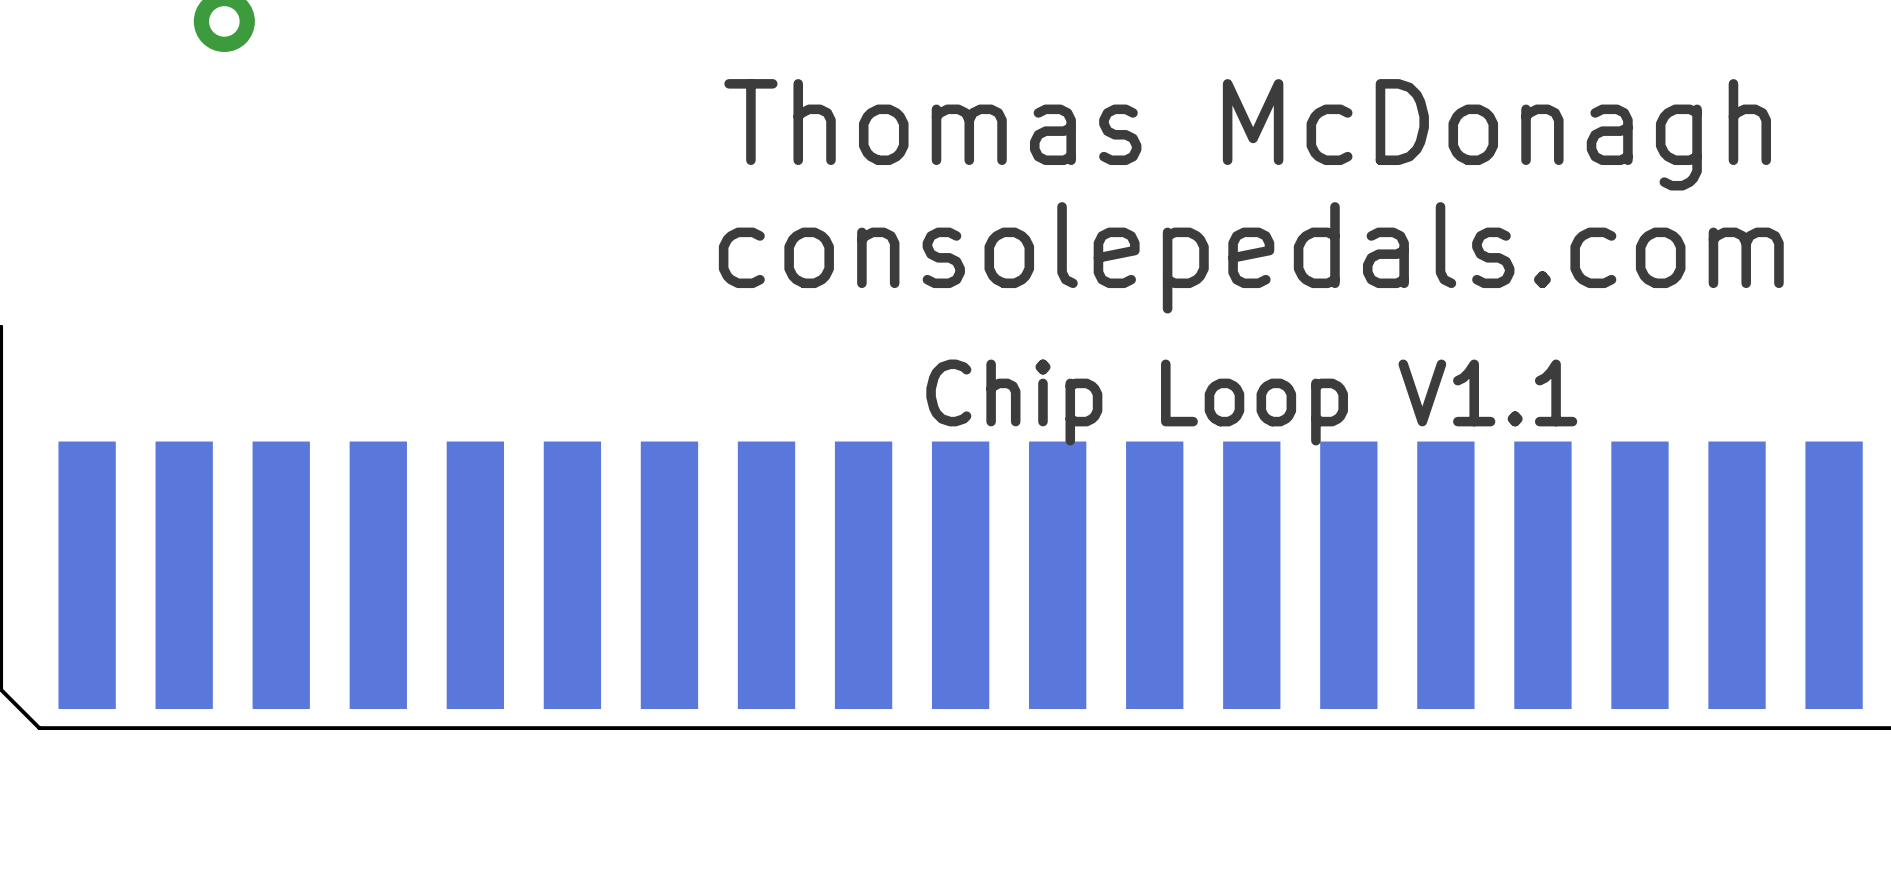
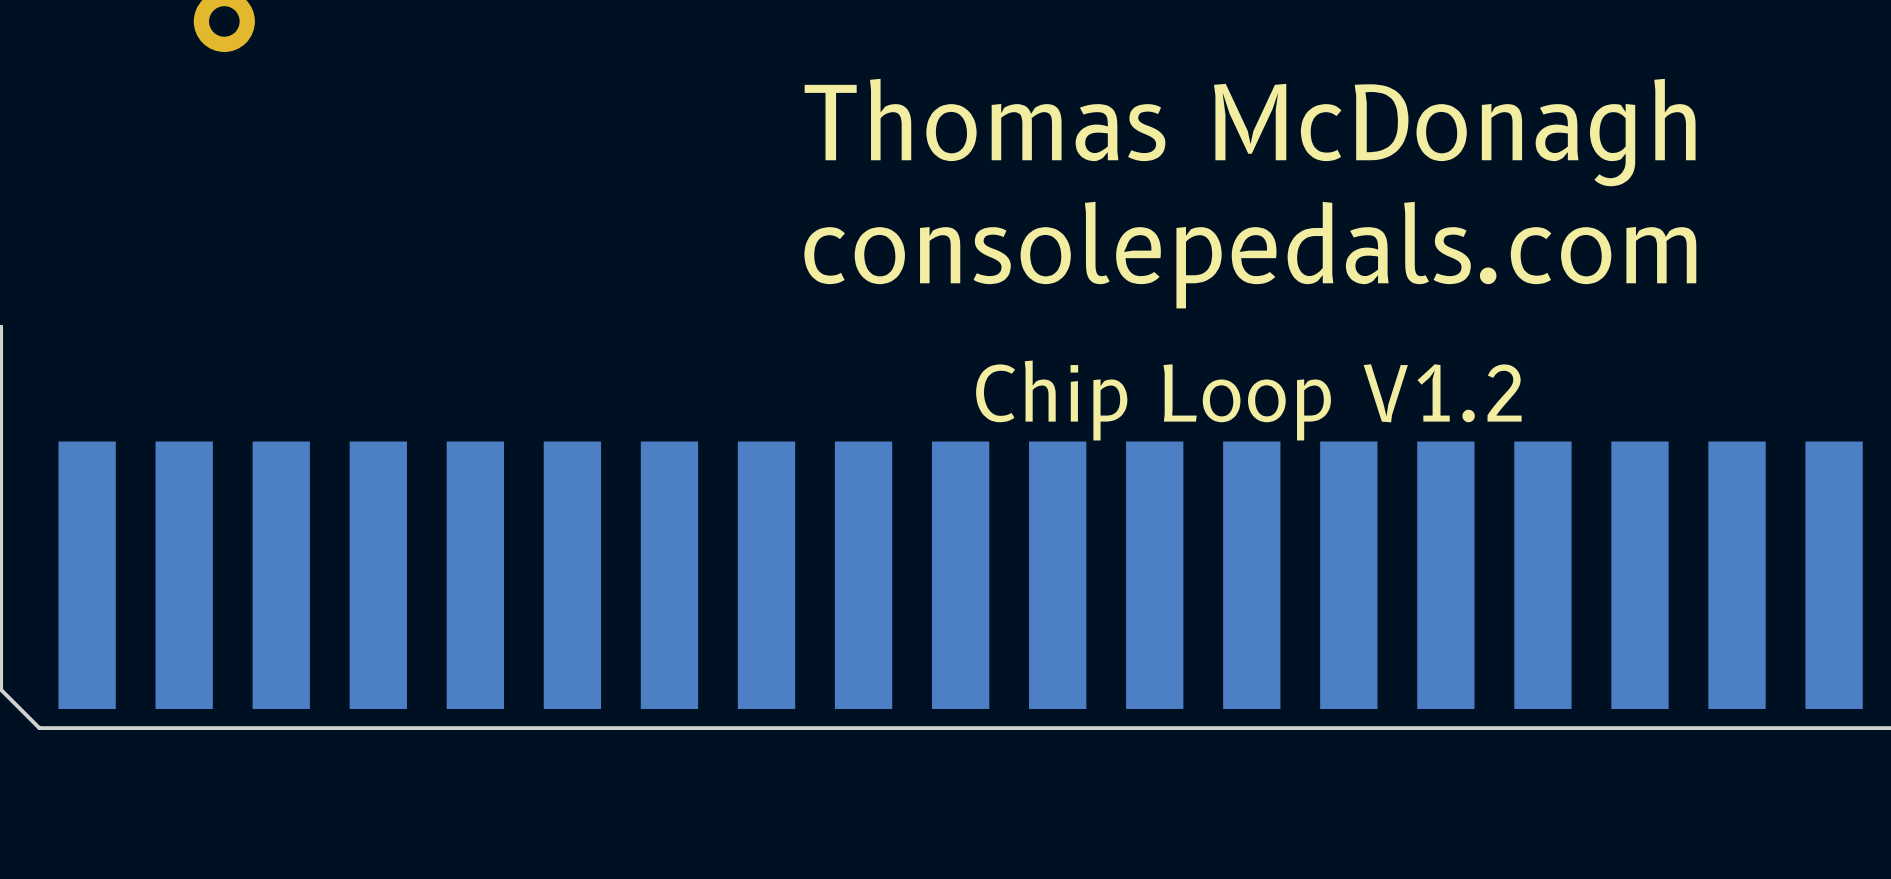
text: Chip Loop V1.1 (1251, 402) -> Chip Loop V1.2 (1248, 400)

